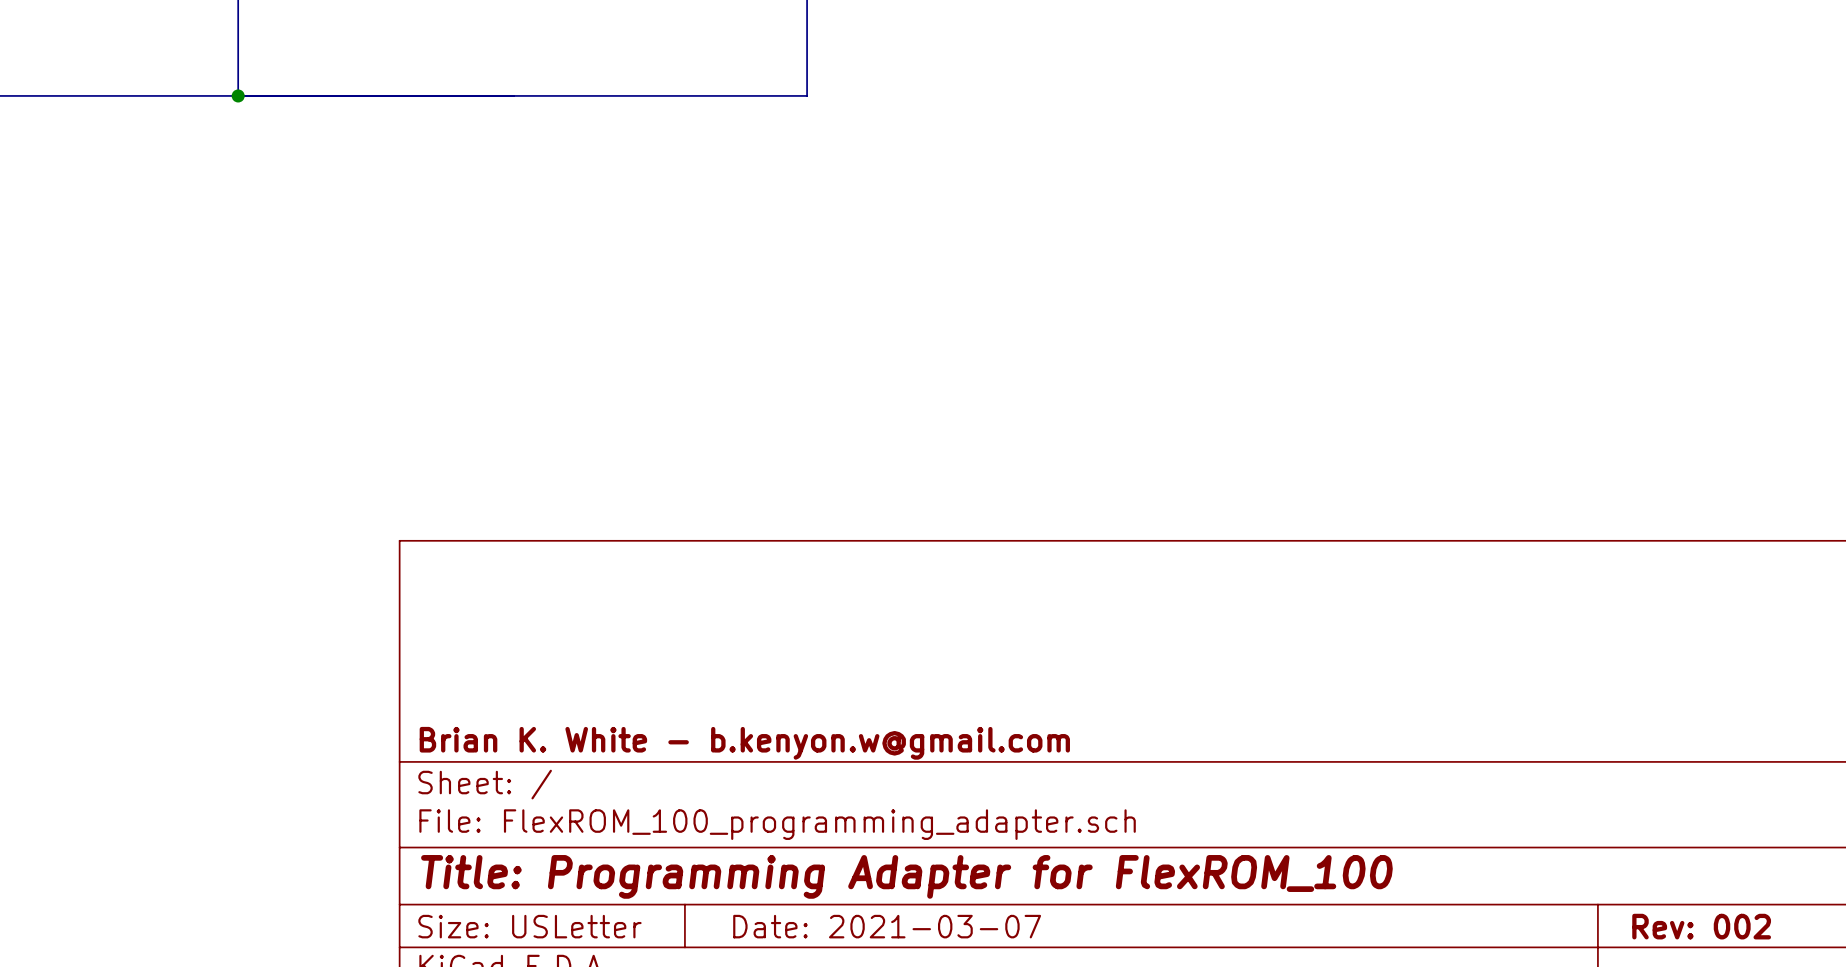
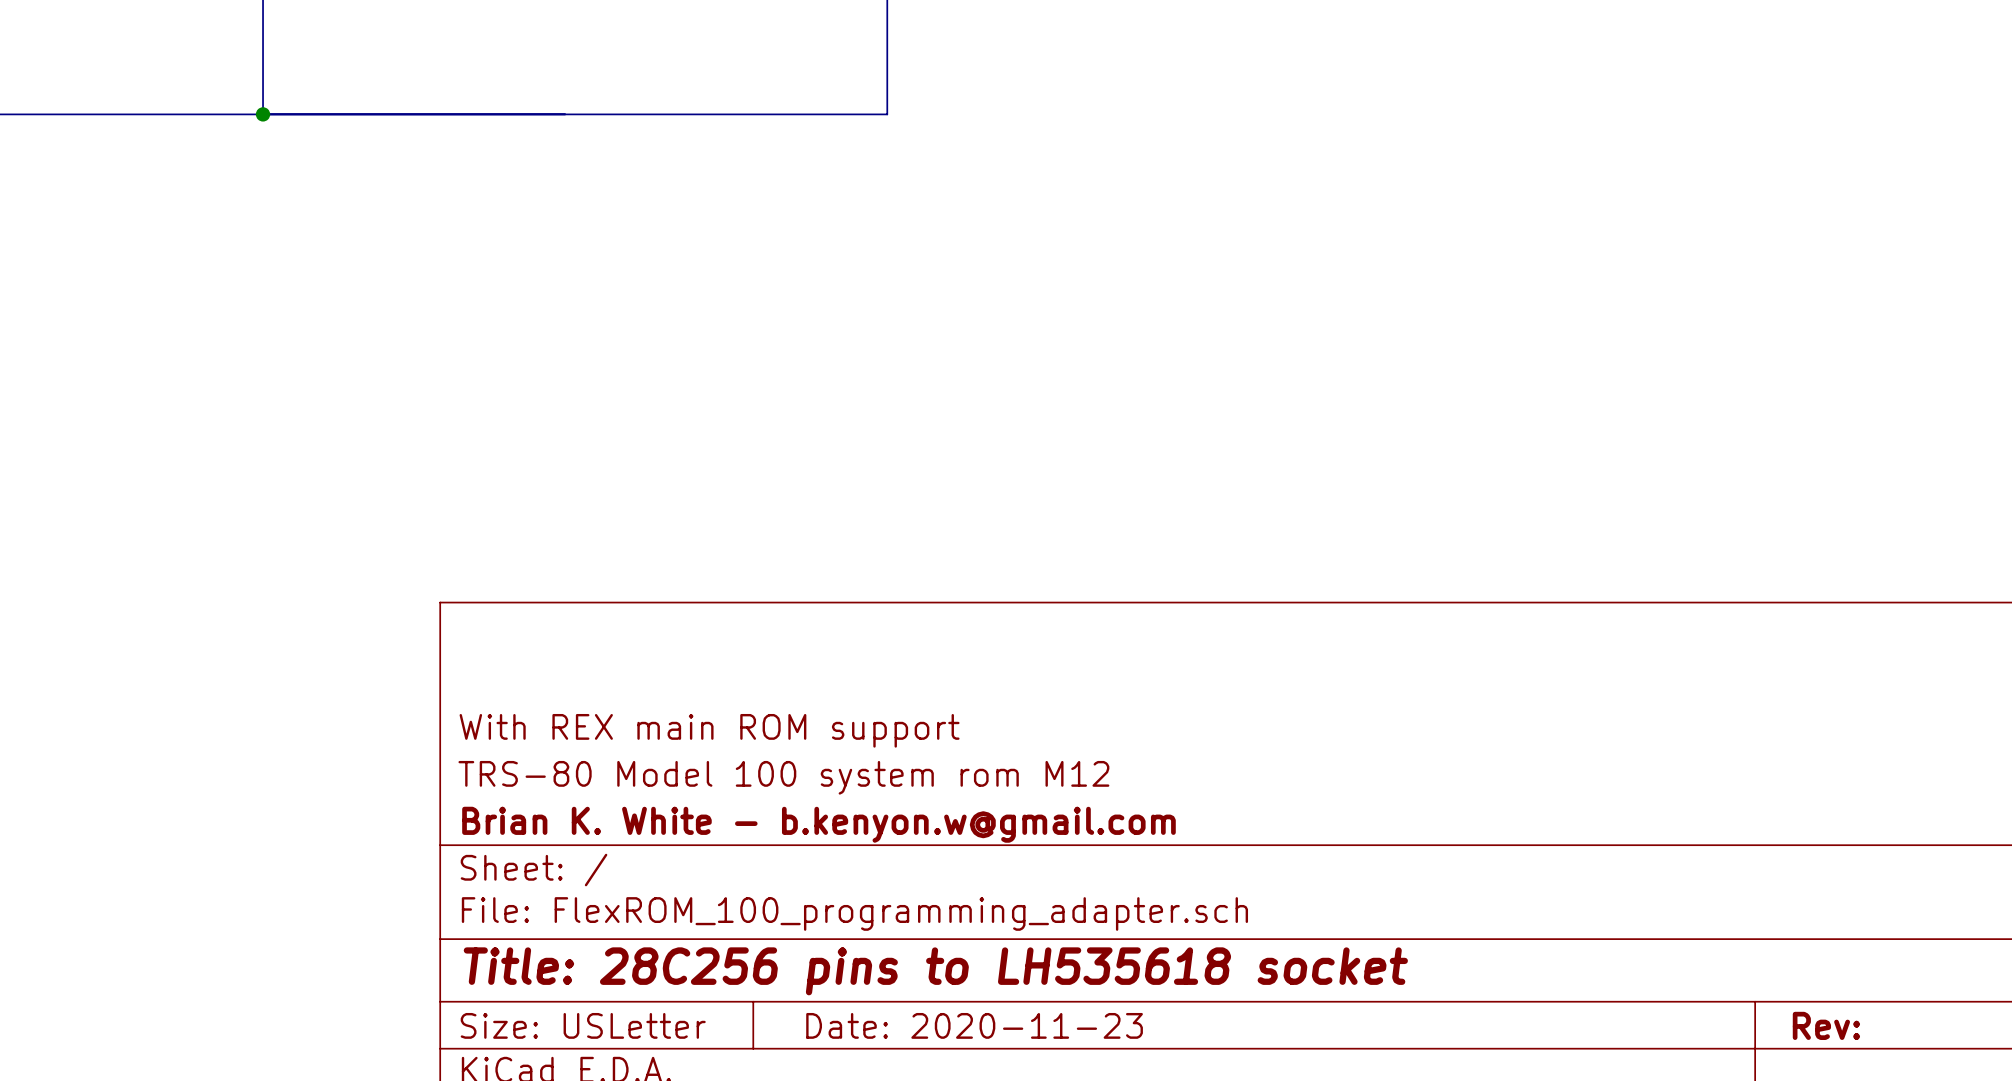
title block: none -> With REX main ROM support (709, 730)
title block: none -> TRS-80 Model 100 system rom M12 (783, 777)
title block: Title: Programming Adapter for FlexROM_100 (906, 876) -> Title: 28C256 pins to LH535618 socket (935, 971)
title block: Date: 2021-03-07 (887, 926) -> Date: 2020-11-23 (974, 1025)
title block: Rev: 002 (1701, 926) -> Rev: (1826, 1025)

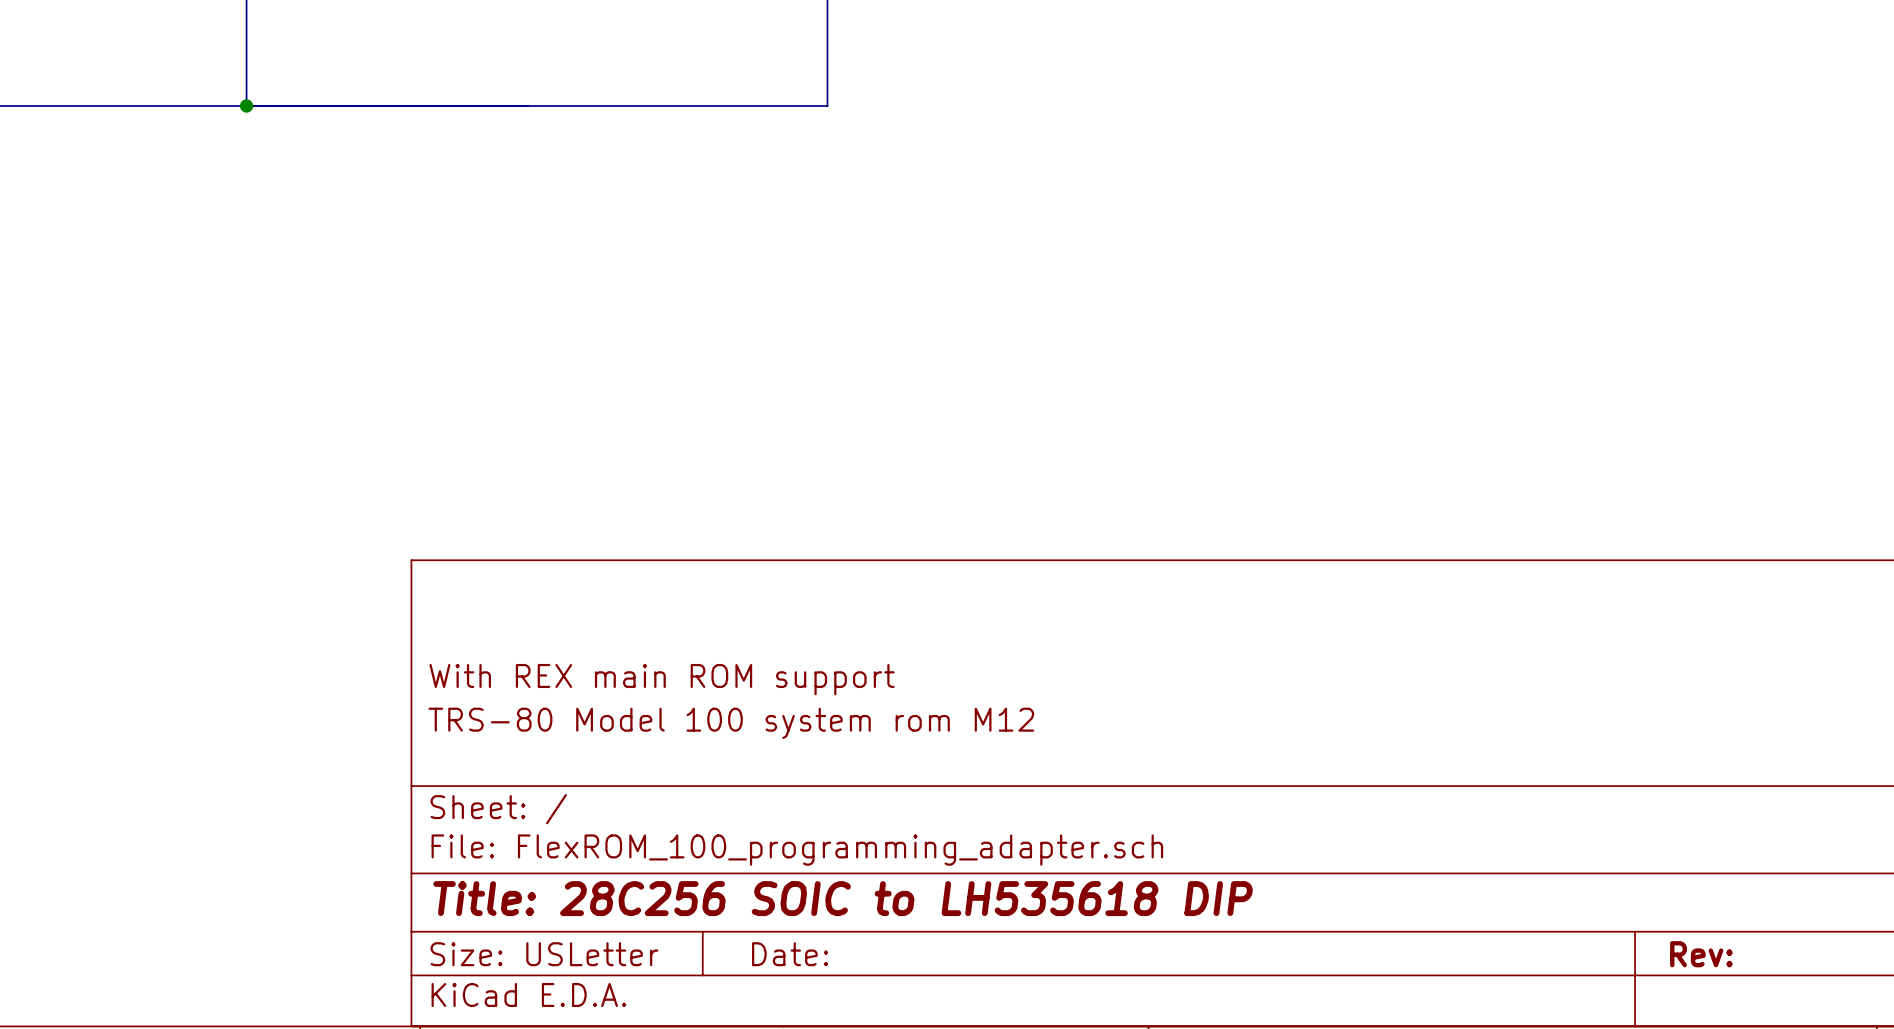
title block: Brian K. White - b.kenyon.w@gmail.com (818, 824) -> none
title block: Title: 28C256 pins to LH535618 socket (935, 971) -> Title: 28C256 SOIC to LH535618 DIP (843, 898)
title block: Date: 2020-11-23 (974, 1025) -> Date: (790, 954)

